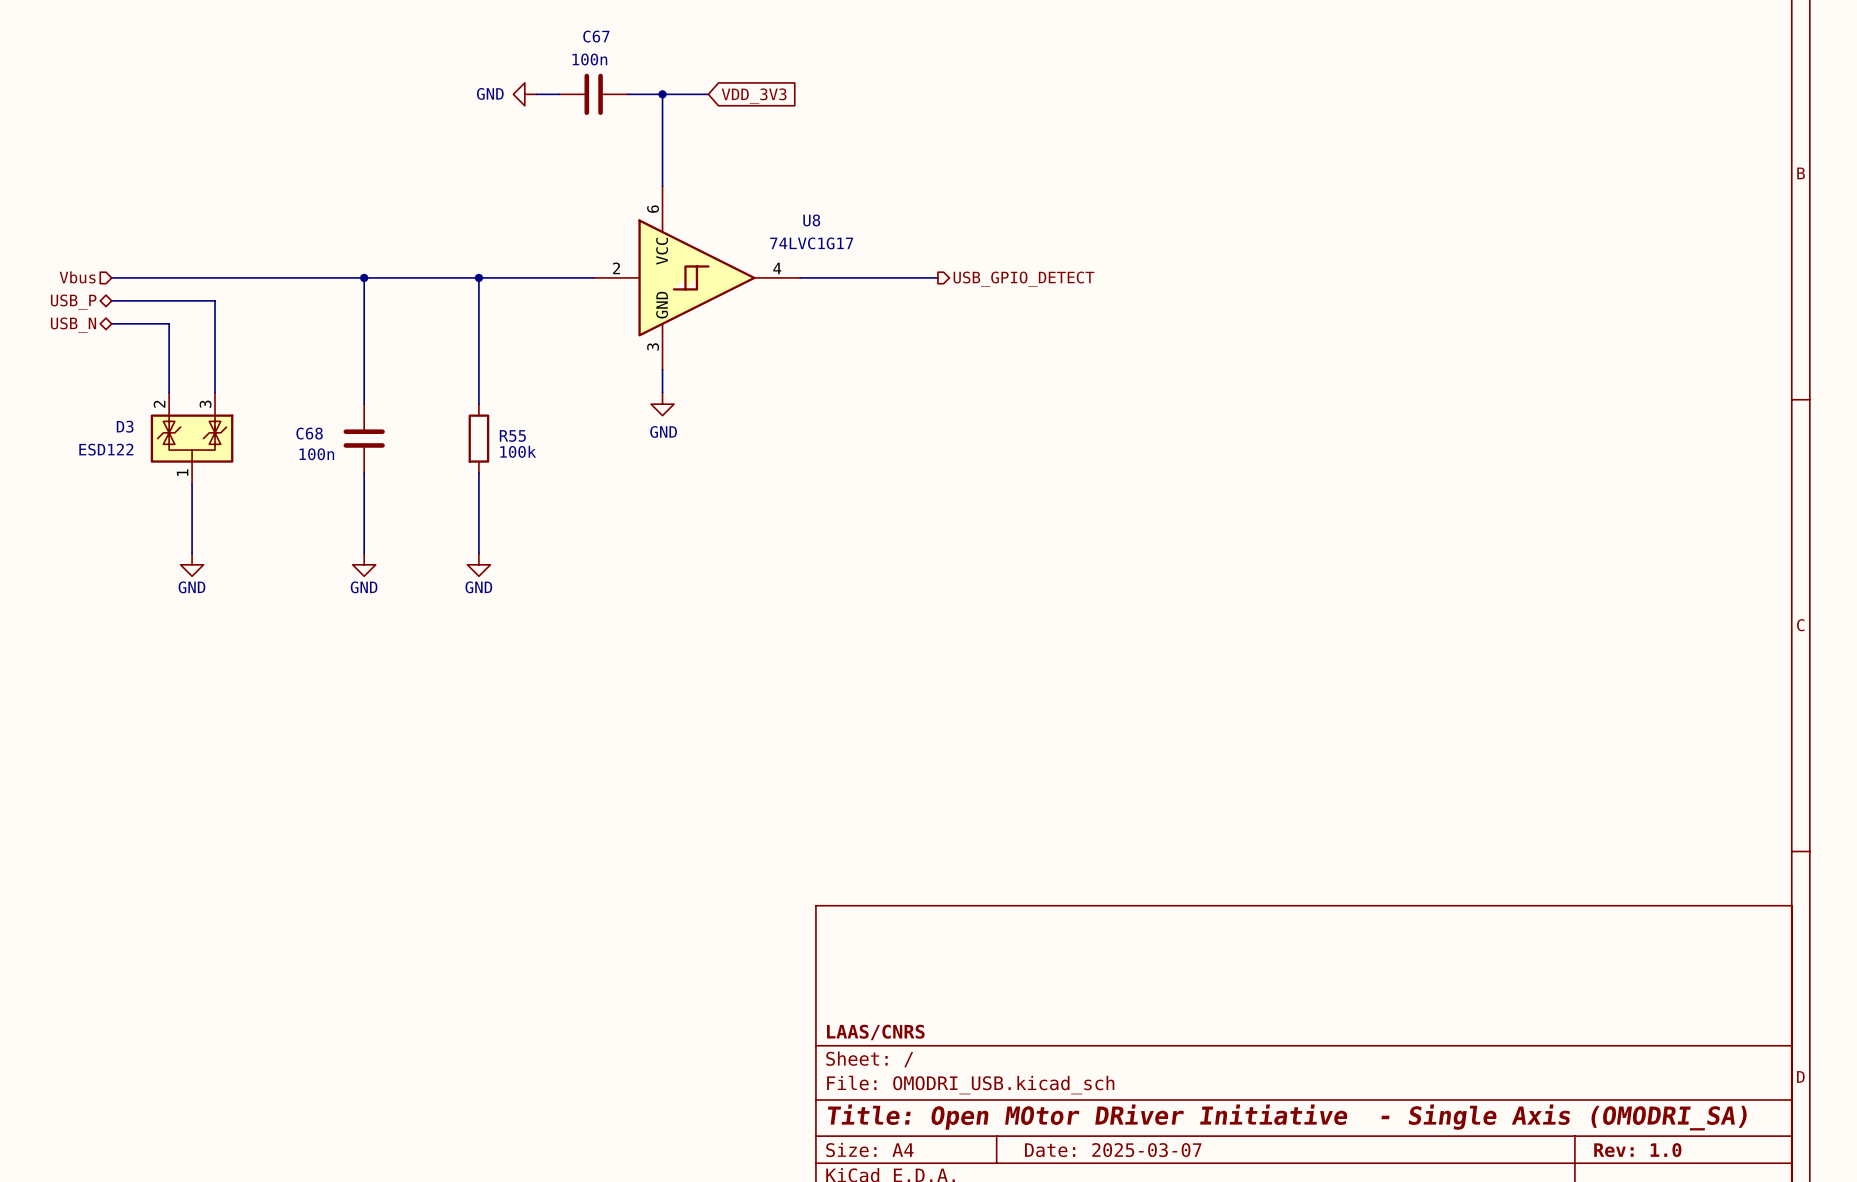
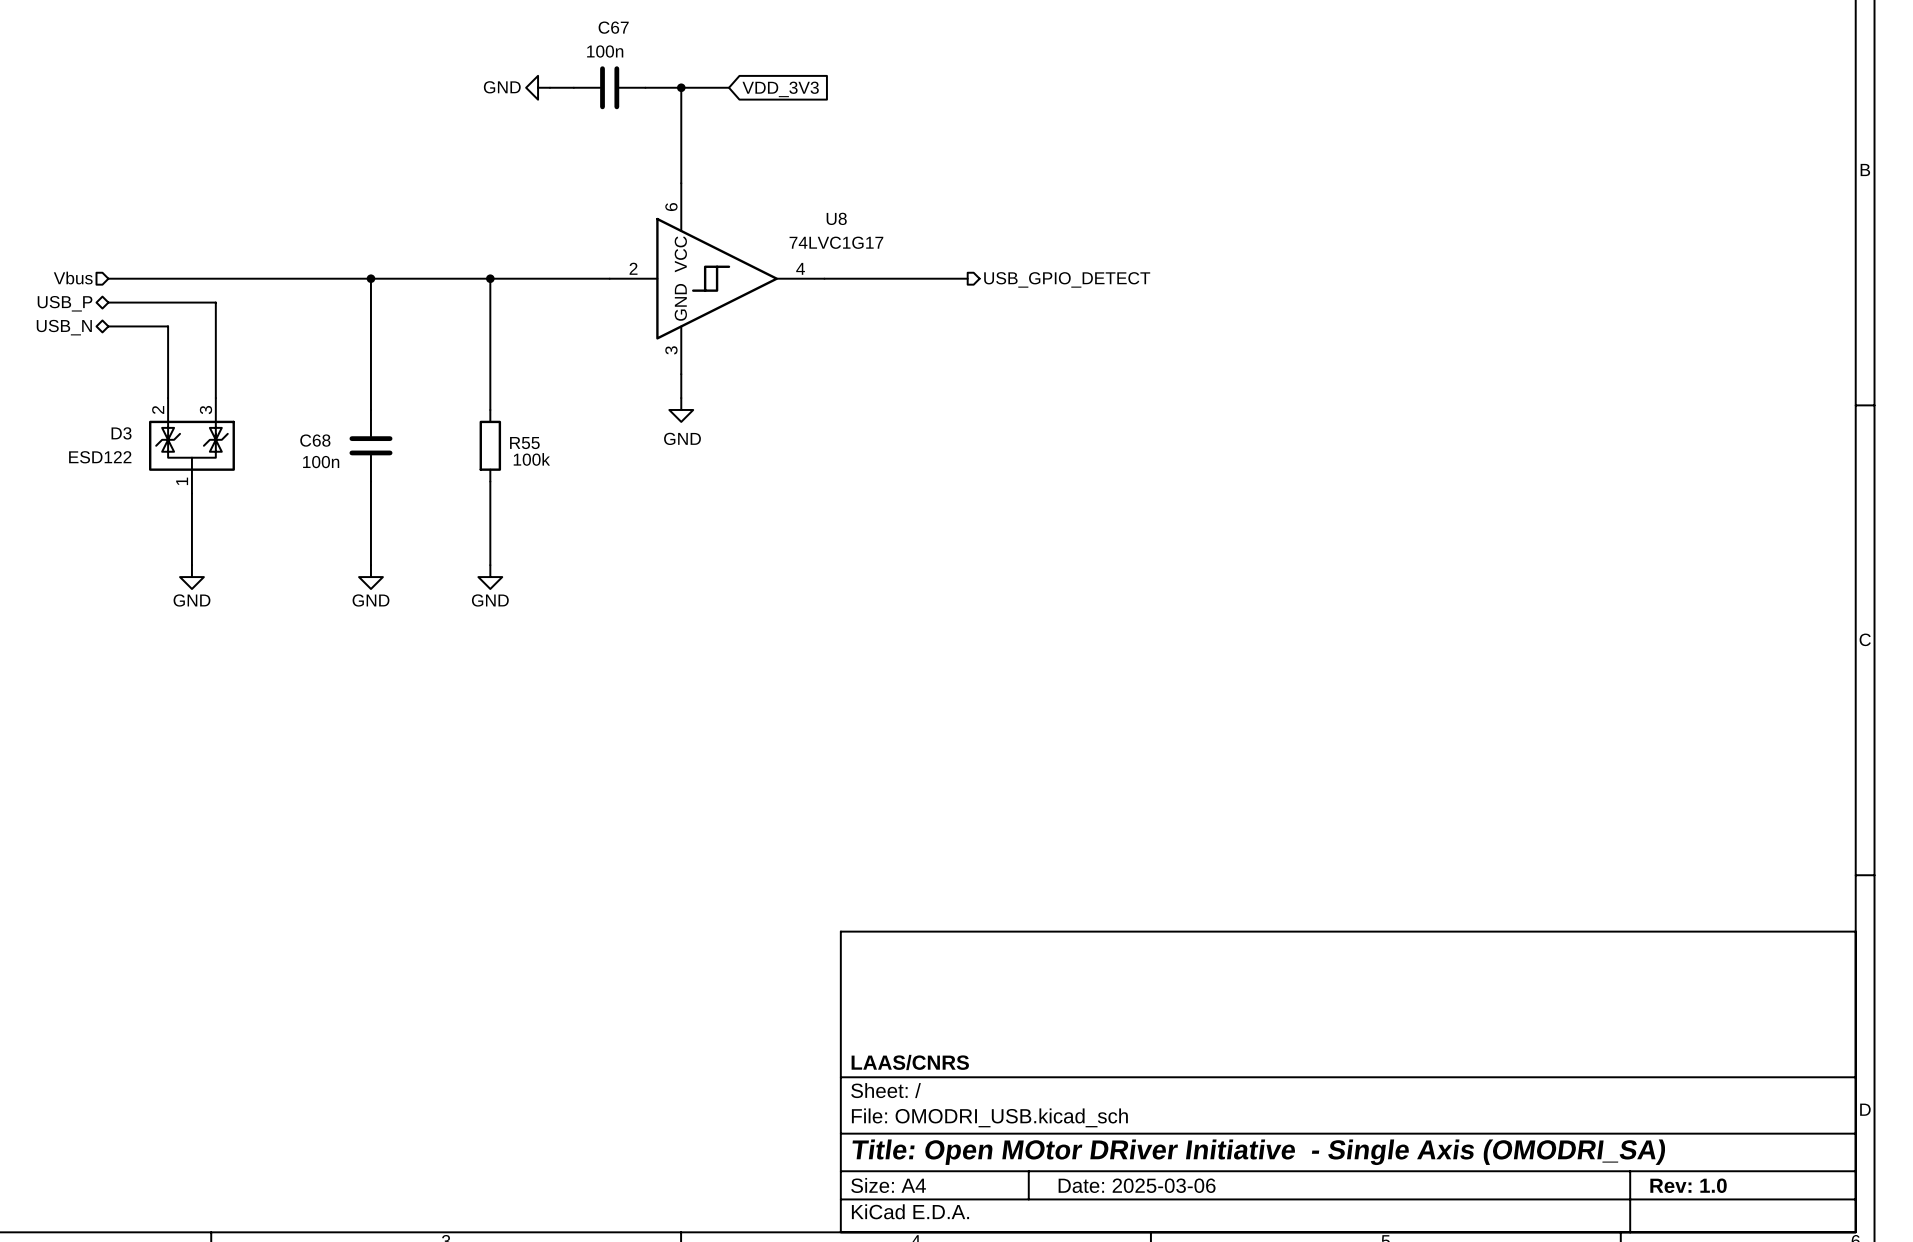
title block: Date: 2025-03-07 (1113, 1150) -> Date: 2025-03-06 (1137, 1185)

